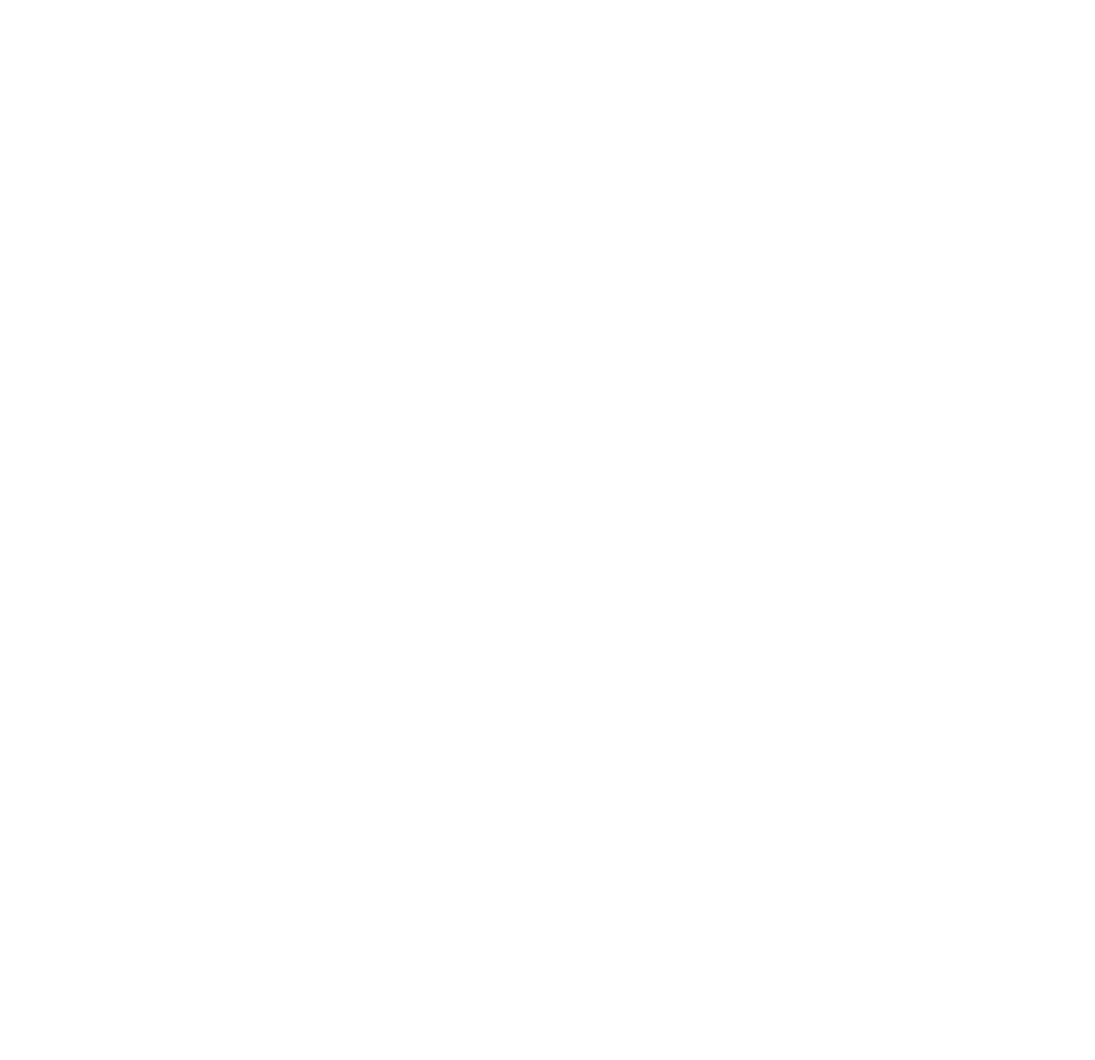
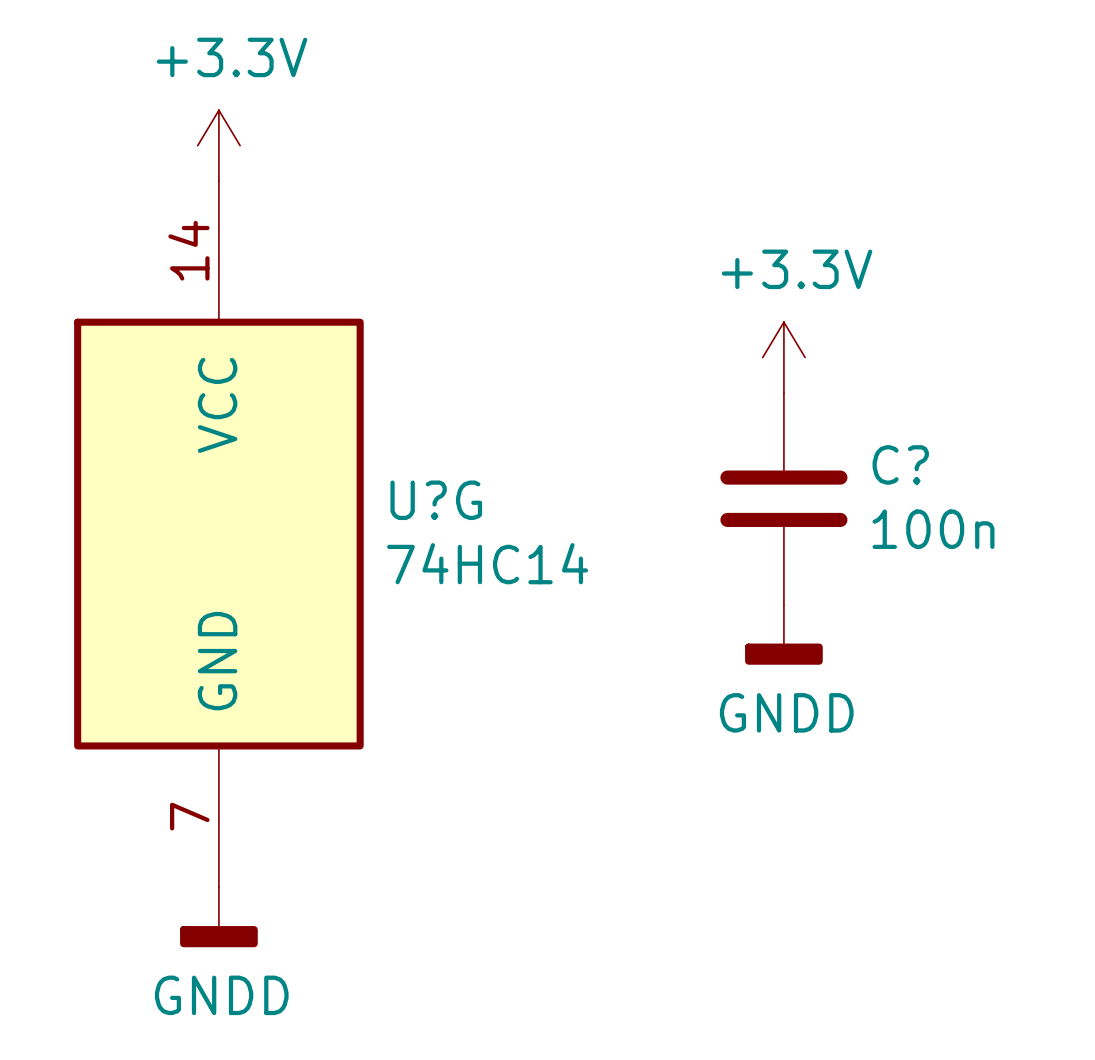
power symbol: none -> +3.3V (218, 145)
power symbol: none -> +3.3V (783, 357)
C?: none -> 100n (783, 498)
U?G: none -> 74HC14 (218, 534)
power symbol: none -> GNDD (783, 634)
power symbol: none -> GNDD (218, 917)

